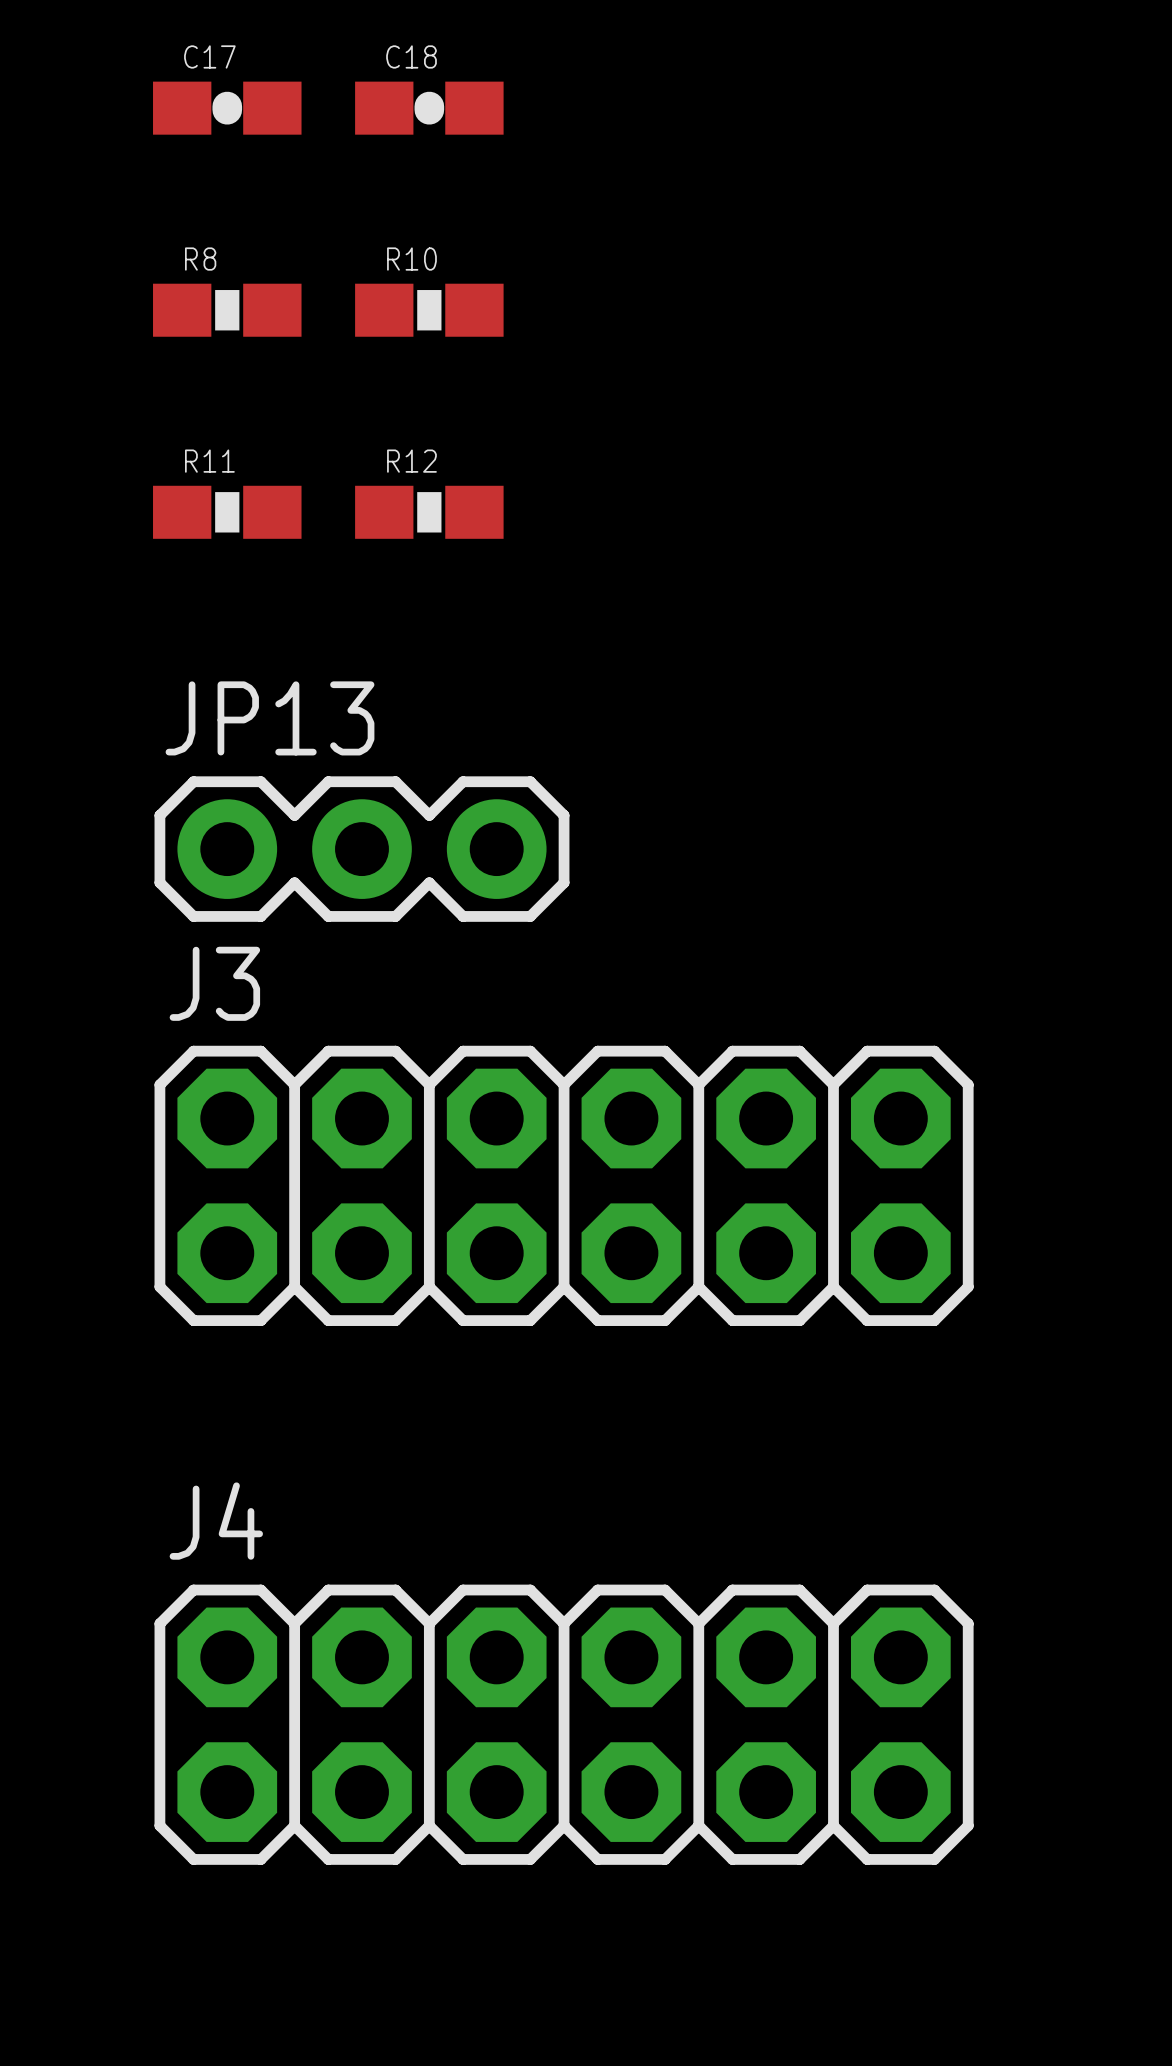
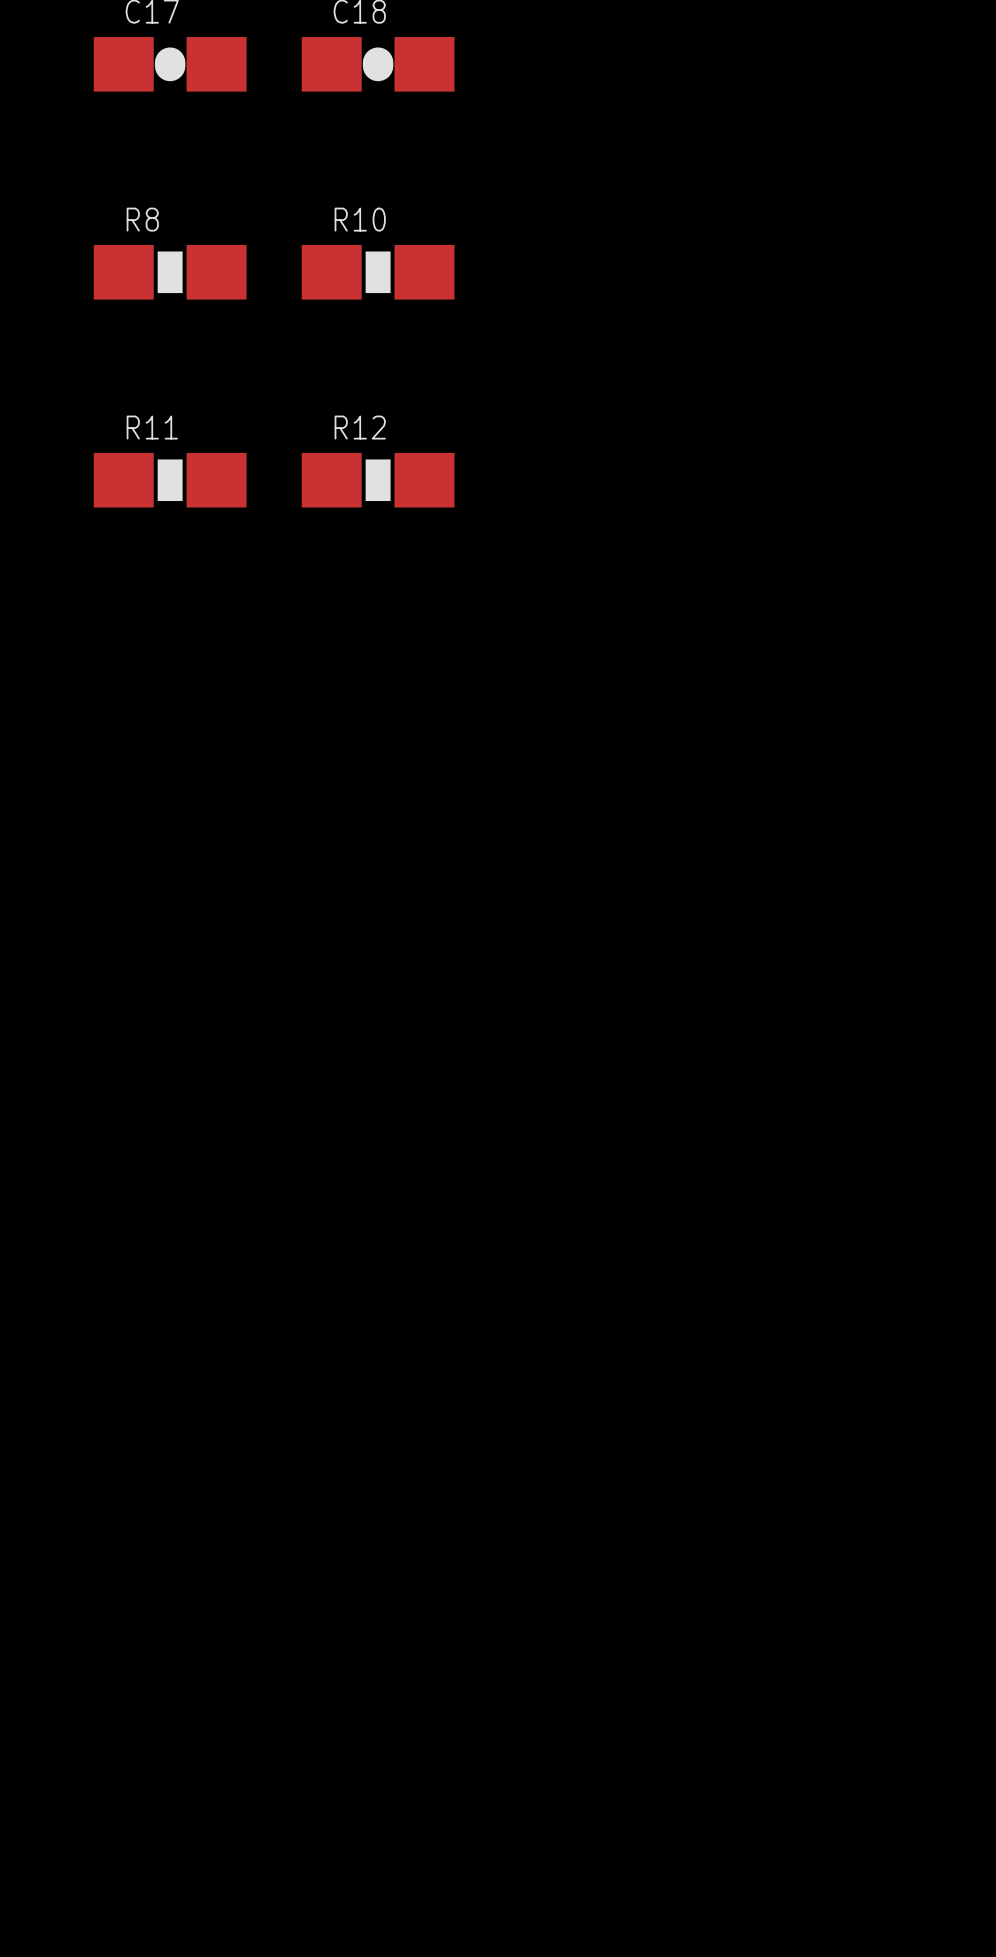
JP13: (361, 849) -> none
J3: (564, 1185) -> none
J4: (564, 1724) -> none

